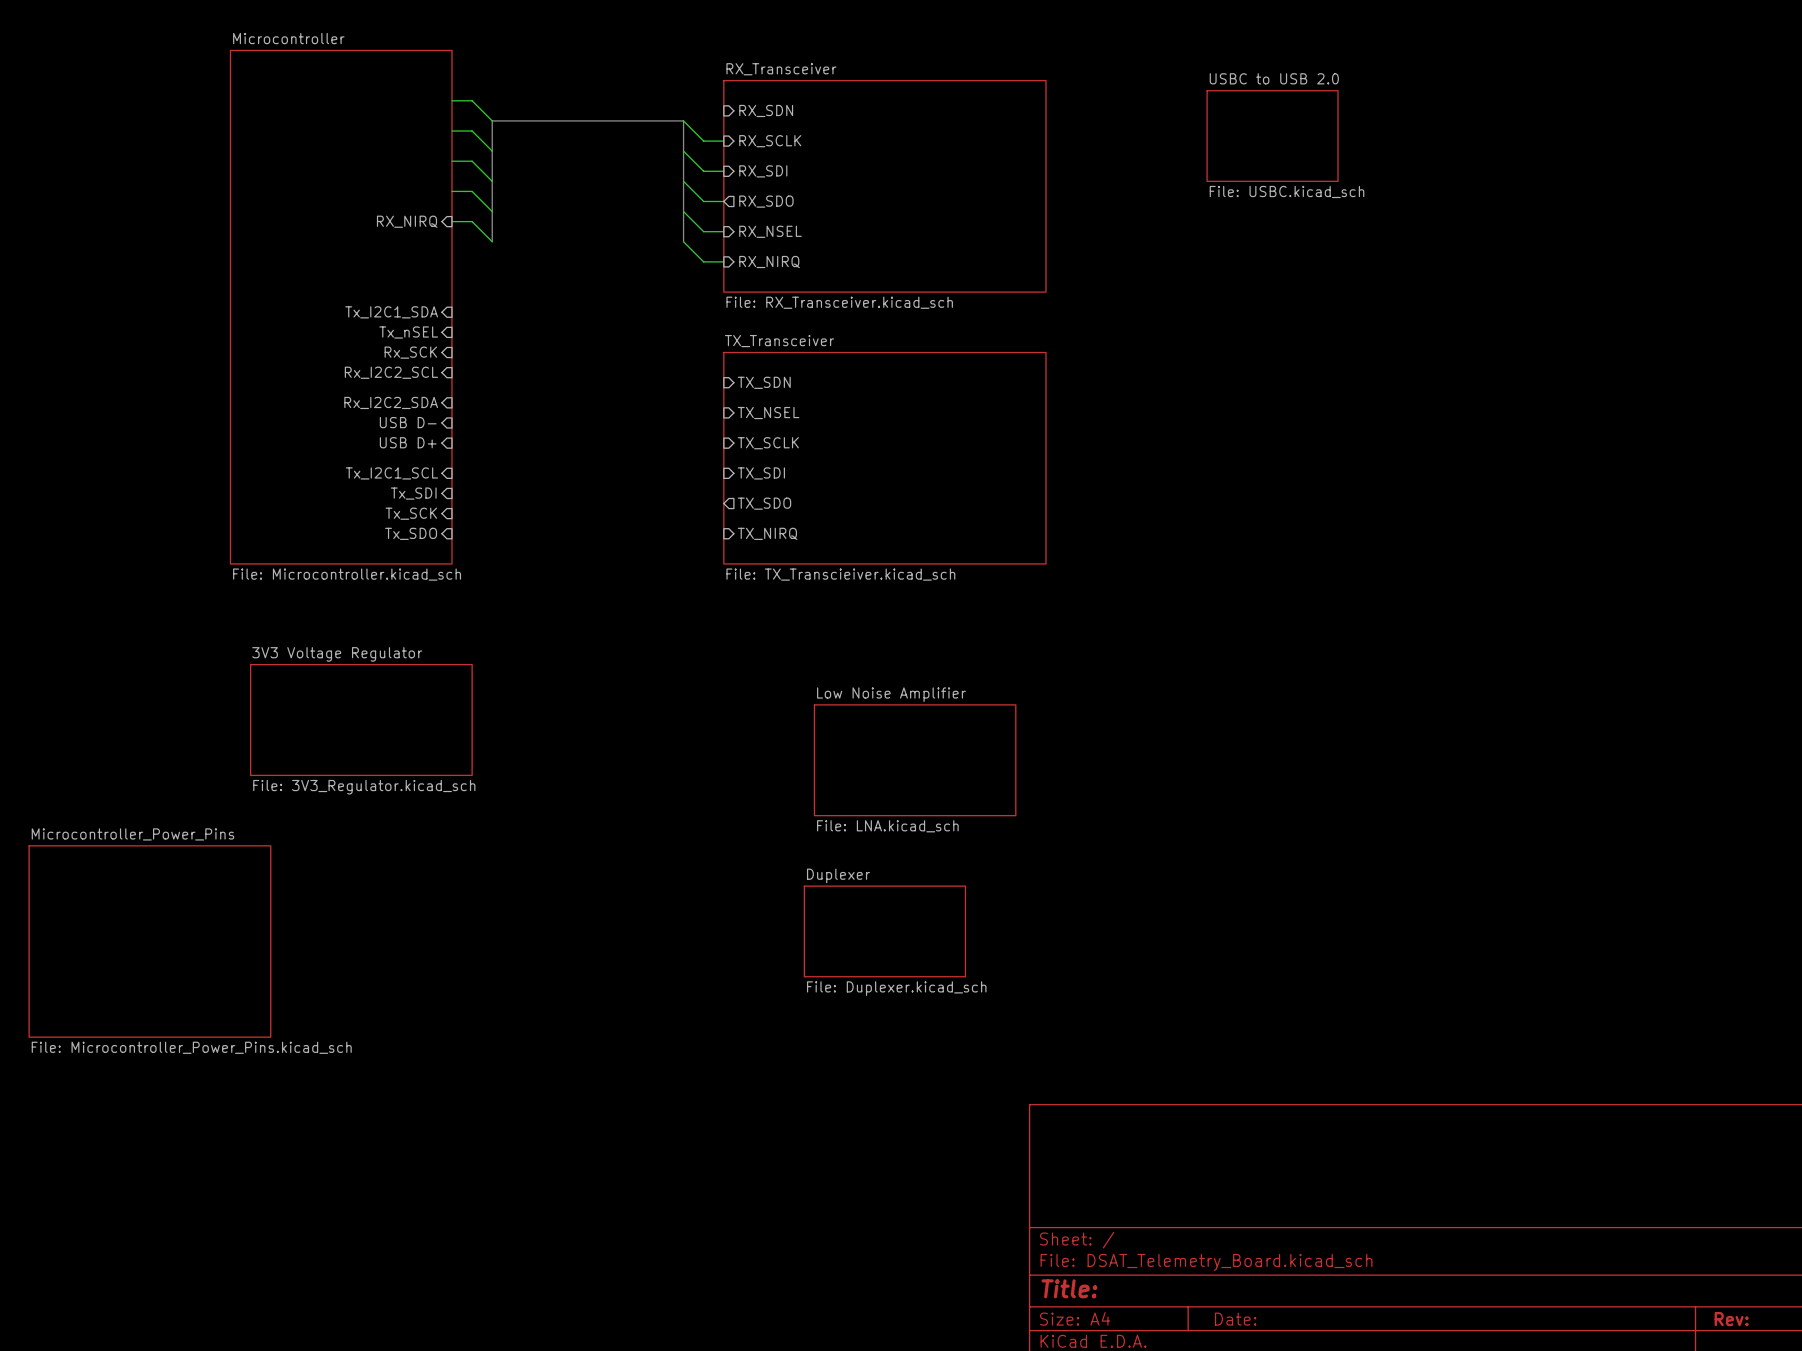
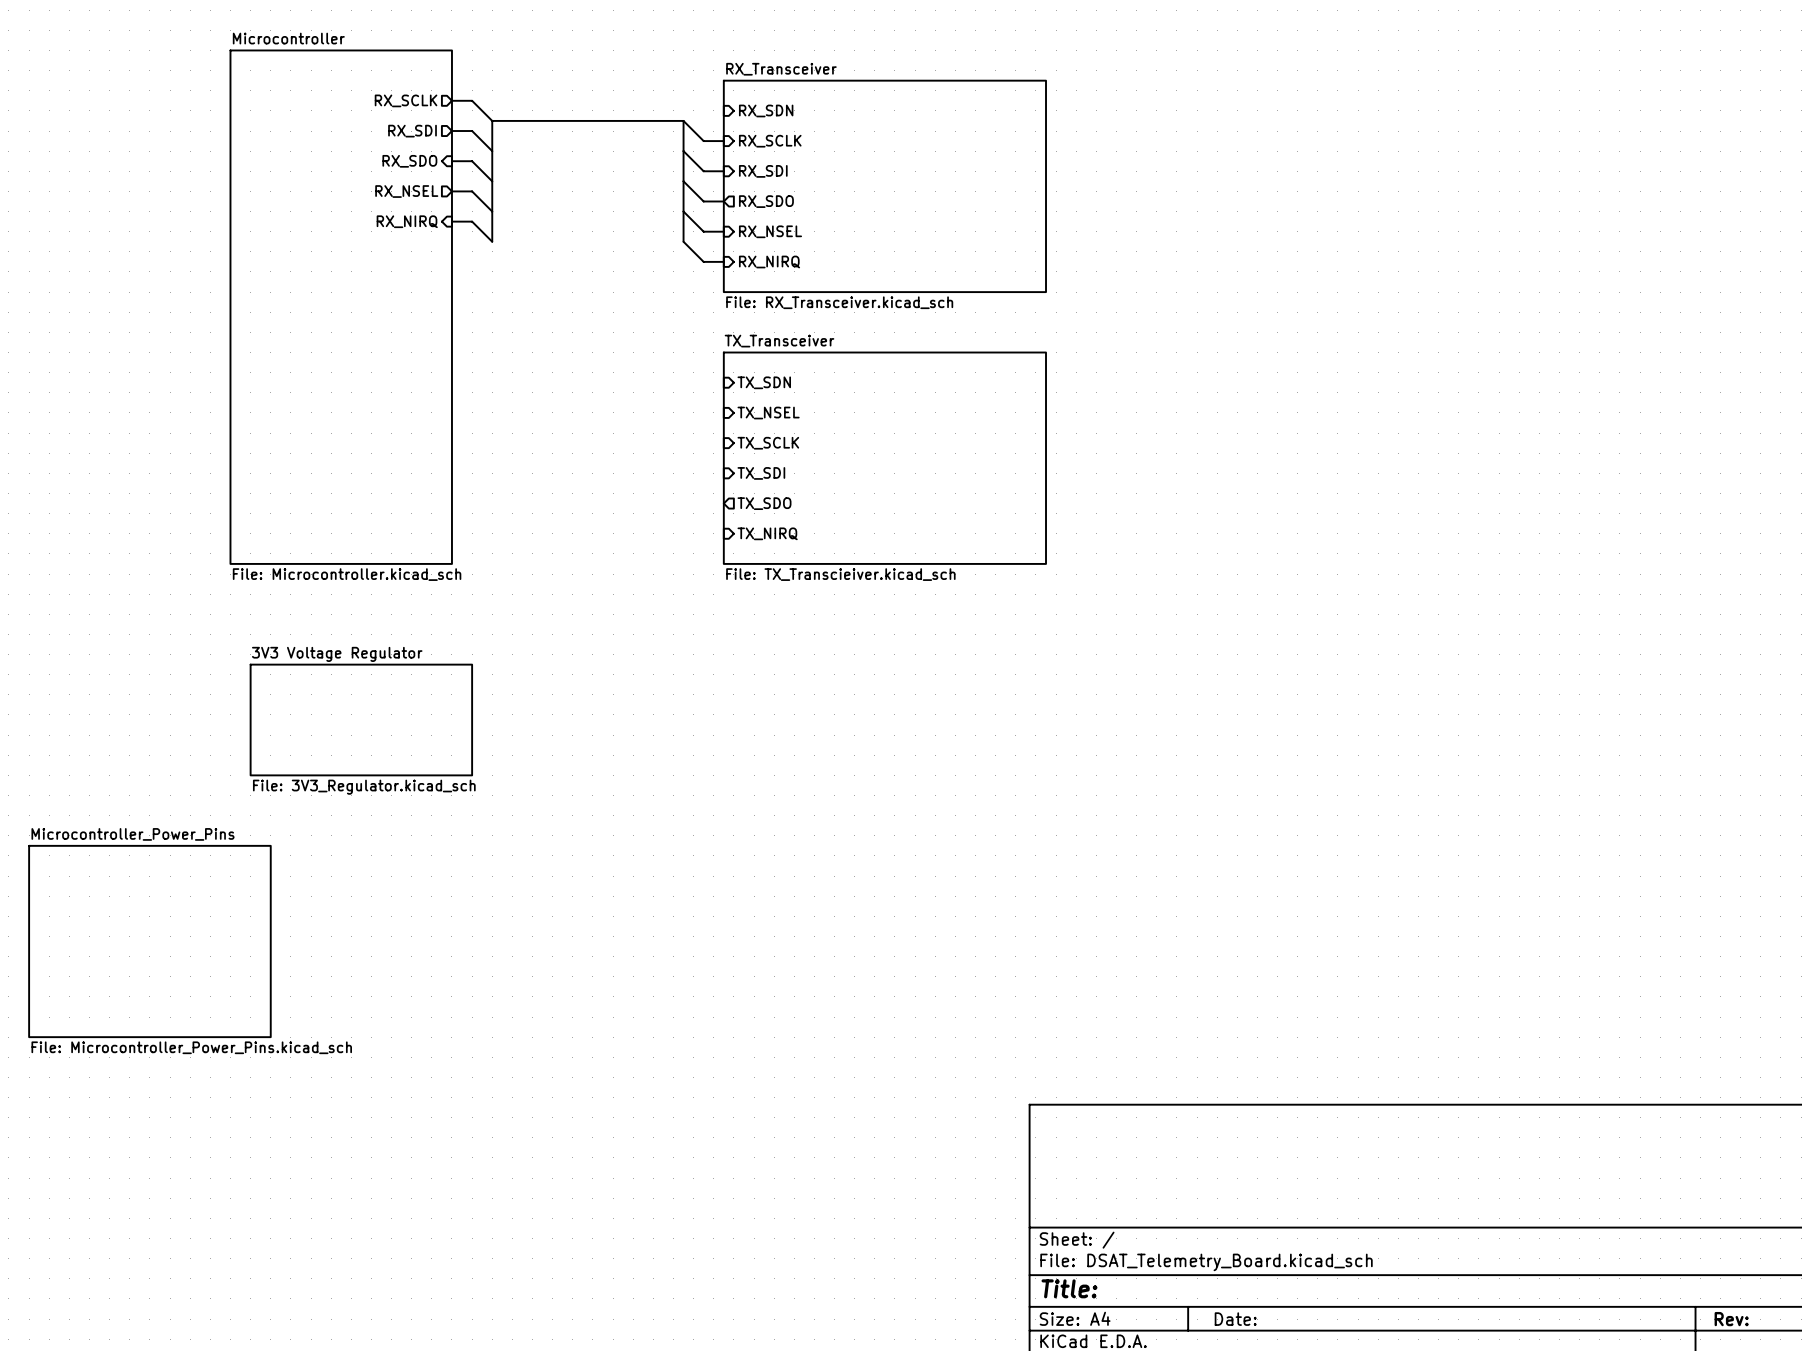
sheet pin: none -> RX_SCLK (406, 100)
sheet pin: none -> RX_SDI (412, 131)
sheet USBC to USB 2.0: File: USBC.kicad_sch (1272, 136) -> none
sheet pin: none -> RX_SDO (409, 161)
sheet pin: none -> RX_NSEL (406, 191)
sheet pin: Tx_I2C1_SDA (391, 312) -> none
sheet pin: Tx_nSEL (408, 332) -> none
sheet pin: Rx_SCK (410, 352) -> none
sheet pin: Rx_I2C2_SCL (391, 372) -> none
sheet pin: Rx_I2C2_SDA (391, 402) -> none
sheet pin: USB D- (408, 422) -> none
sheet pin: USB D+ (408, 442) -> none
sheet pin: Tx_I2C1_SCL (391, 473) -> none
sheet pin: Tx_SDI (413, 493) -> none
sheet pin: Tx_SCK (411, 513) -> none
sheet pin: Tx_SDO (411, 533) -> none
sheet Low Noise Amplifier: File: LNA.kicad_sch (915, 760) -> none
sheet Duplexer: File: Duplexer.kicad_sch (884, 931) -> none

